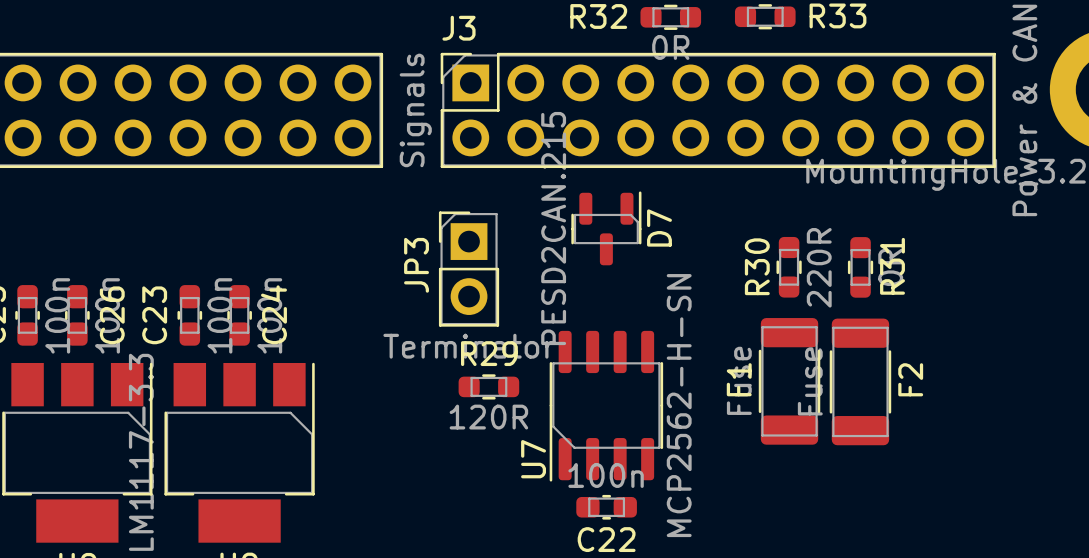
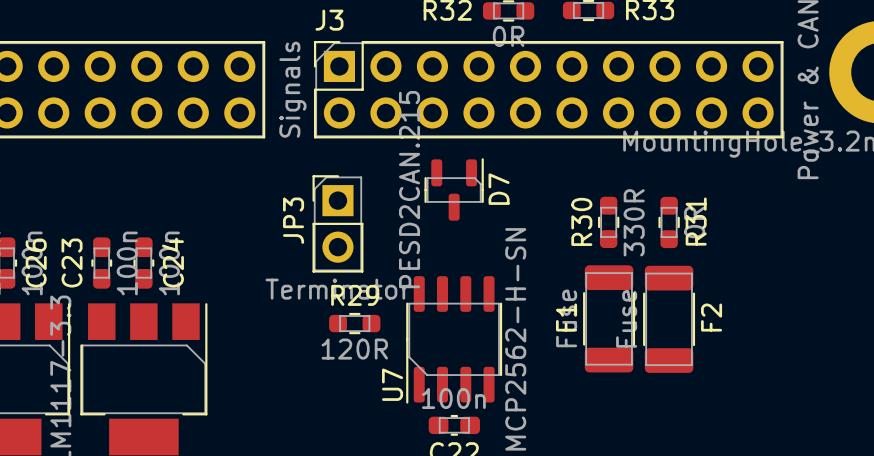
R30 value: 220R (819, 267) -> 330R (634, 222)

